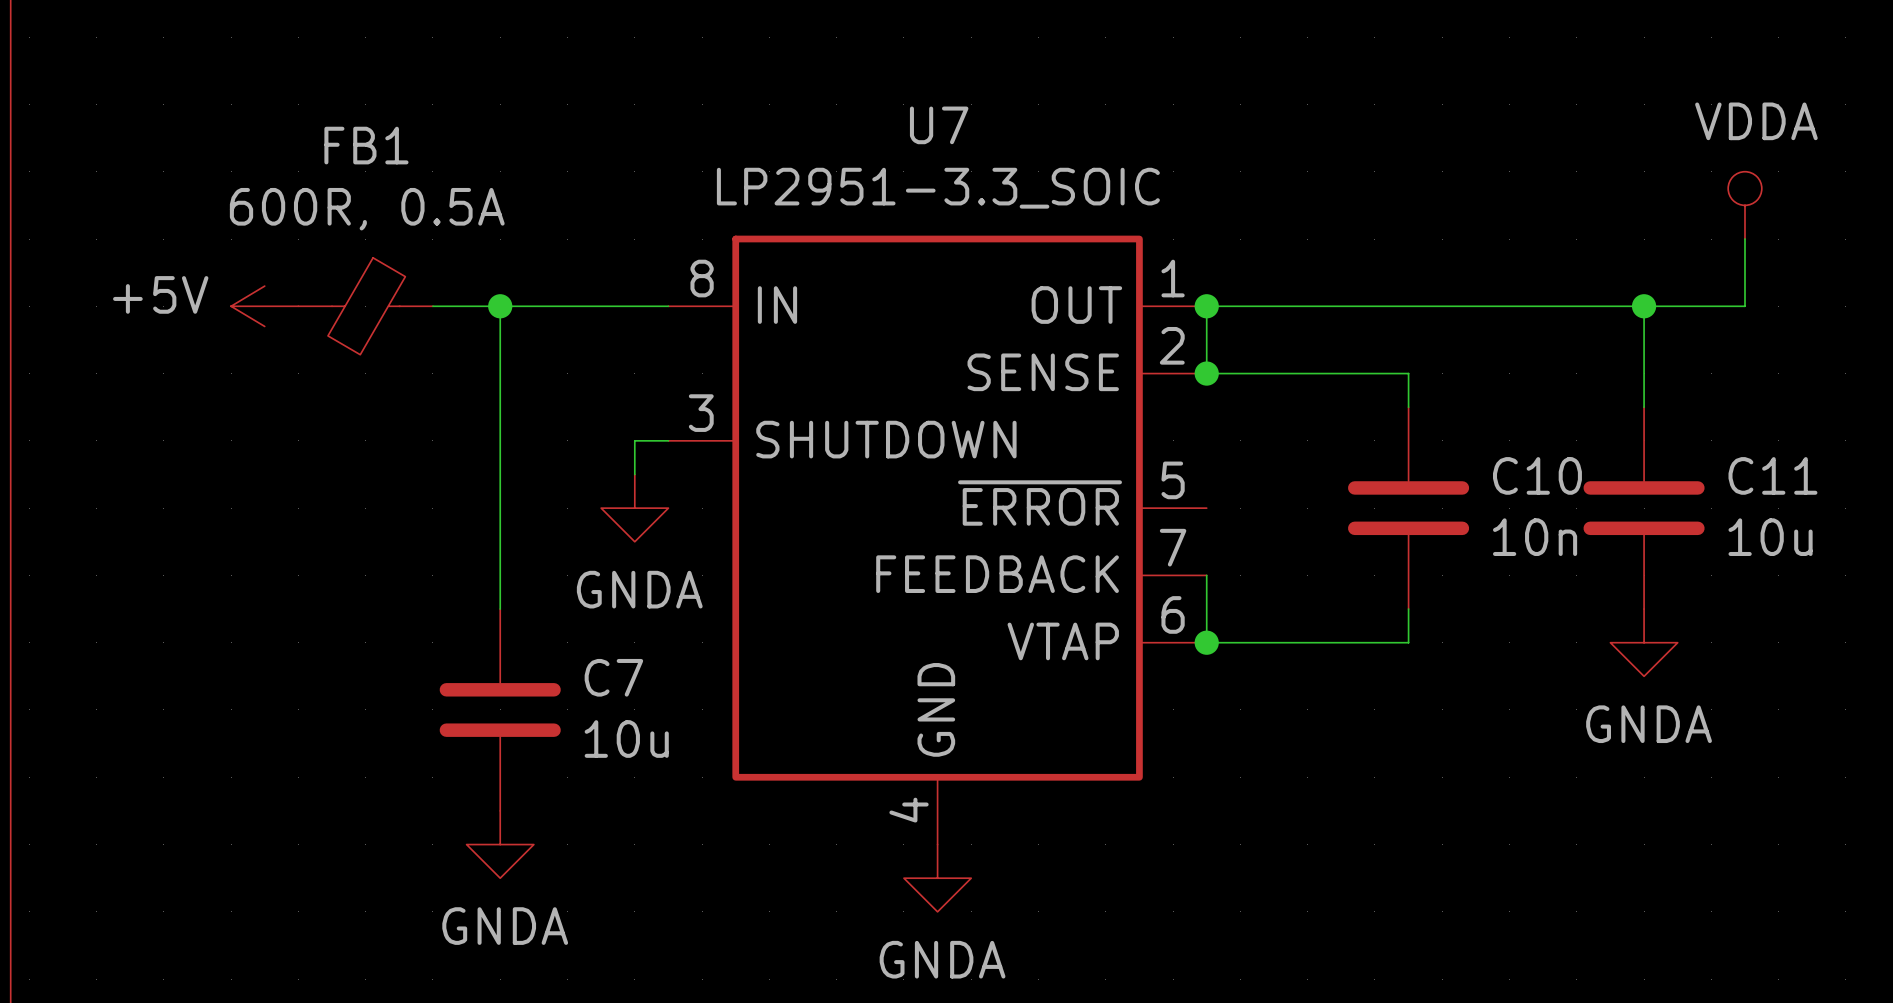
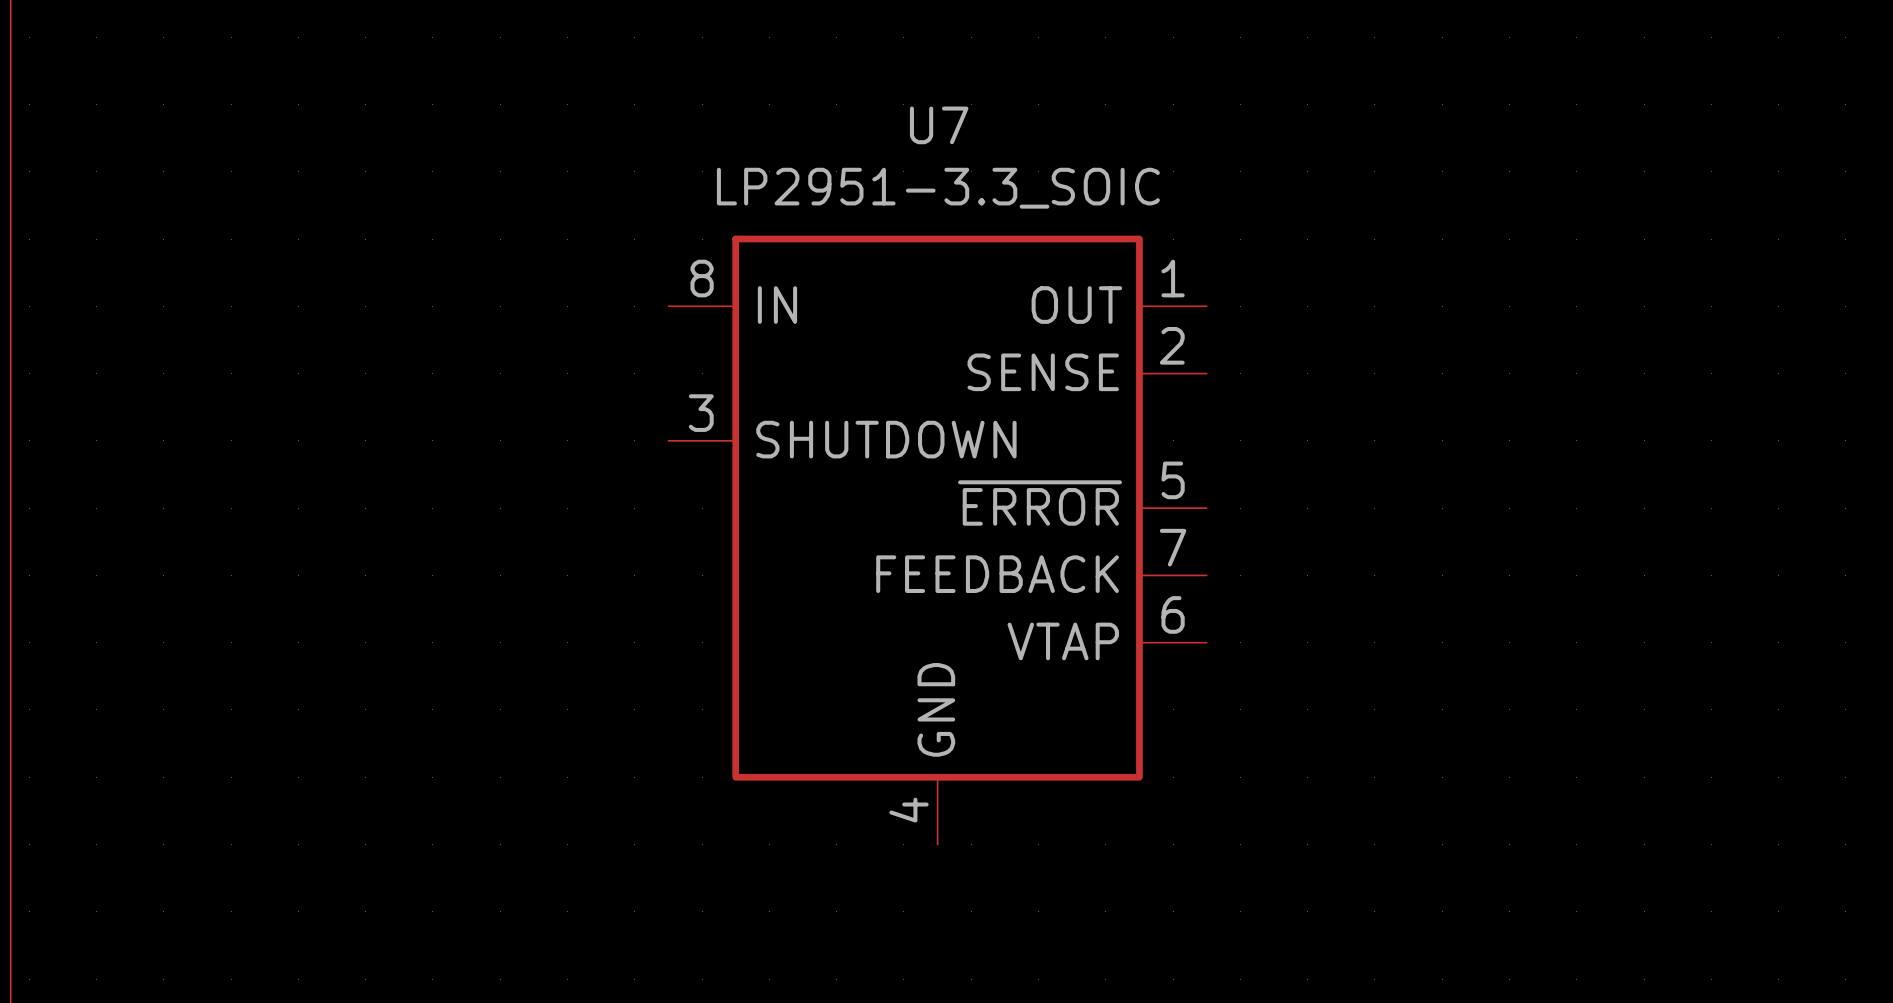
power symbol: VDDA (1744, 205) -> none
wire: (1744, 239) (1744, 306) (1206, 306) (1206, 373) (1408, 373) (1408, 407) -> none
power symbol: +5V (264, 306) -> none
FB1: 600R, 0.5A (365, 306) -> none
wire: (432, 306) (668, 306) -> none
wire: (500, 306) (500, 609) -> none
junction: (500, 306) -> none
junction: (1206, 306) -> none
wire: (1644, 306) (1644, 407) -> none
junction: (1644, 306) -> none
junction: (1206, 373) -> none
wire: (668, 440) (634, 440) (634, 474) -> none
power symbol: GNDA (634, 508) -> none
C10: 10n (1408, 508) -> none
C11: 10u (1644, 508) -> none
wire: (1206, 575) (1206, 642) (1408, 642) (1408, 609) -> none
junction: (1206, 642) -> none
power symbol: GNDA (1644, 642) -> none
C7: 10u (500, 709) -> none
power symbol: GNDA (500, 844) -> none
power symbol: GNDA (937, 878) -> none

